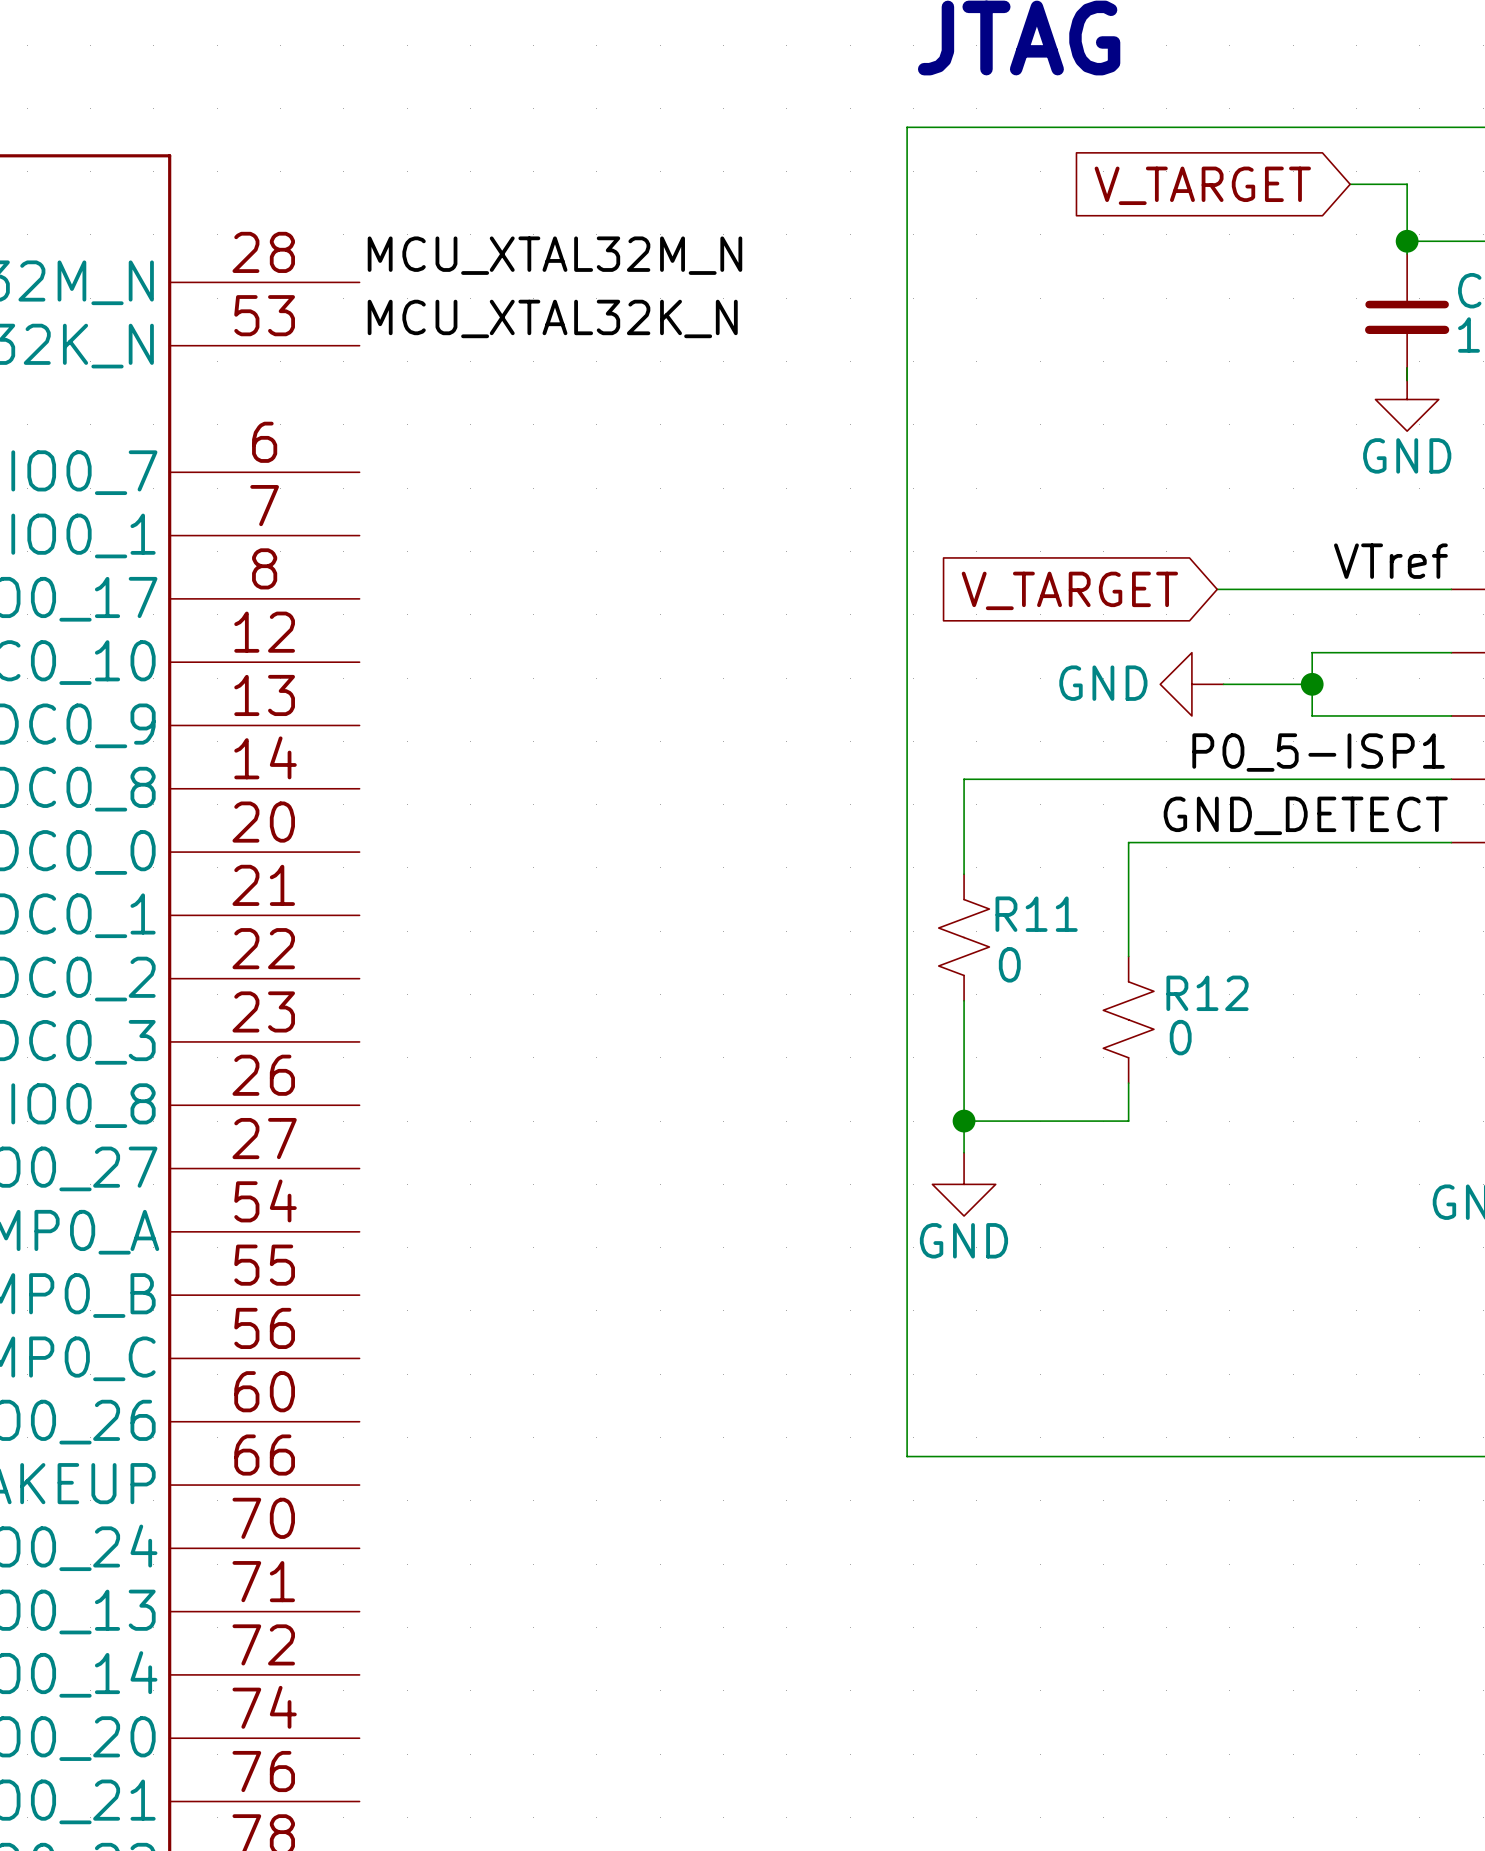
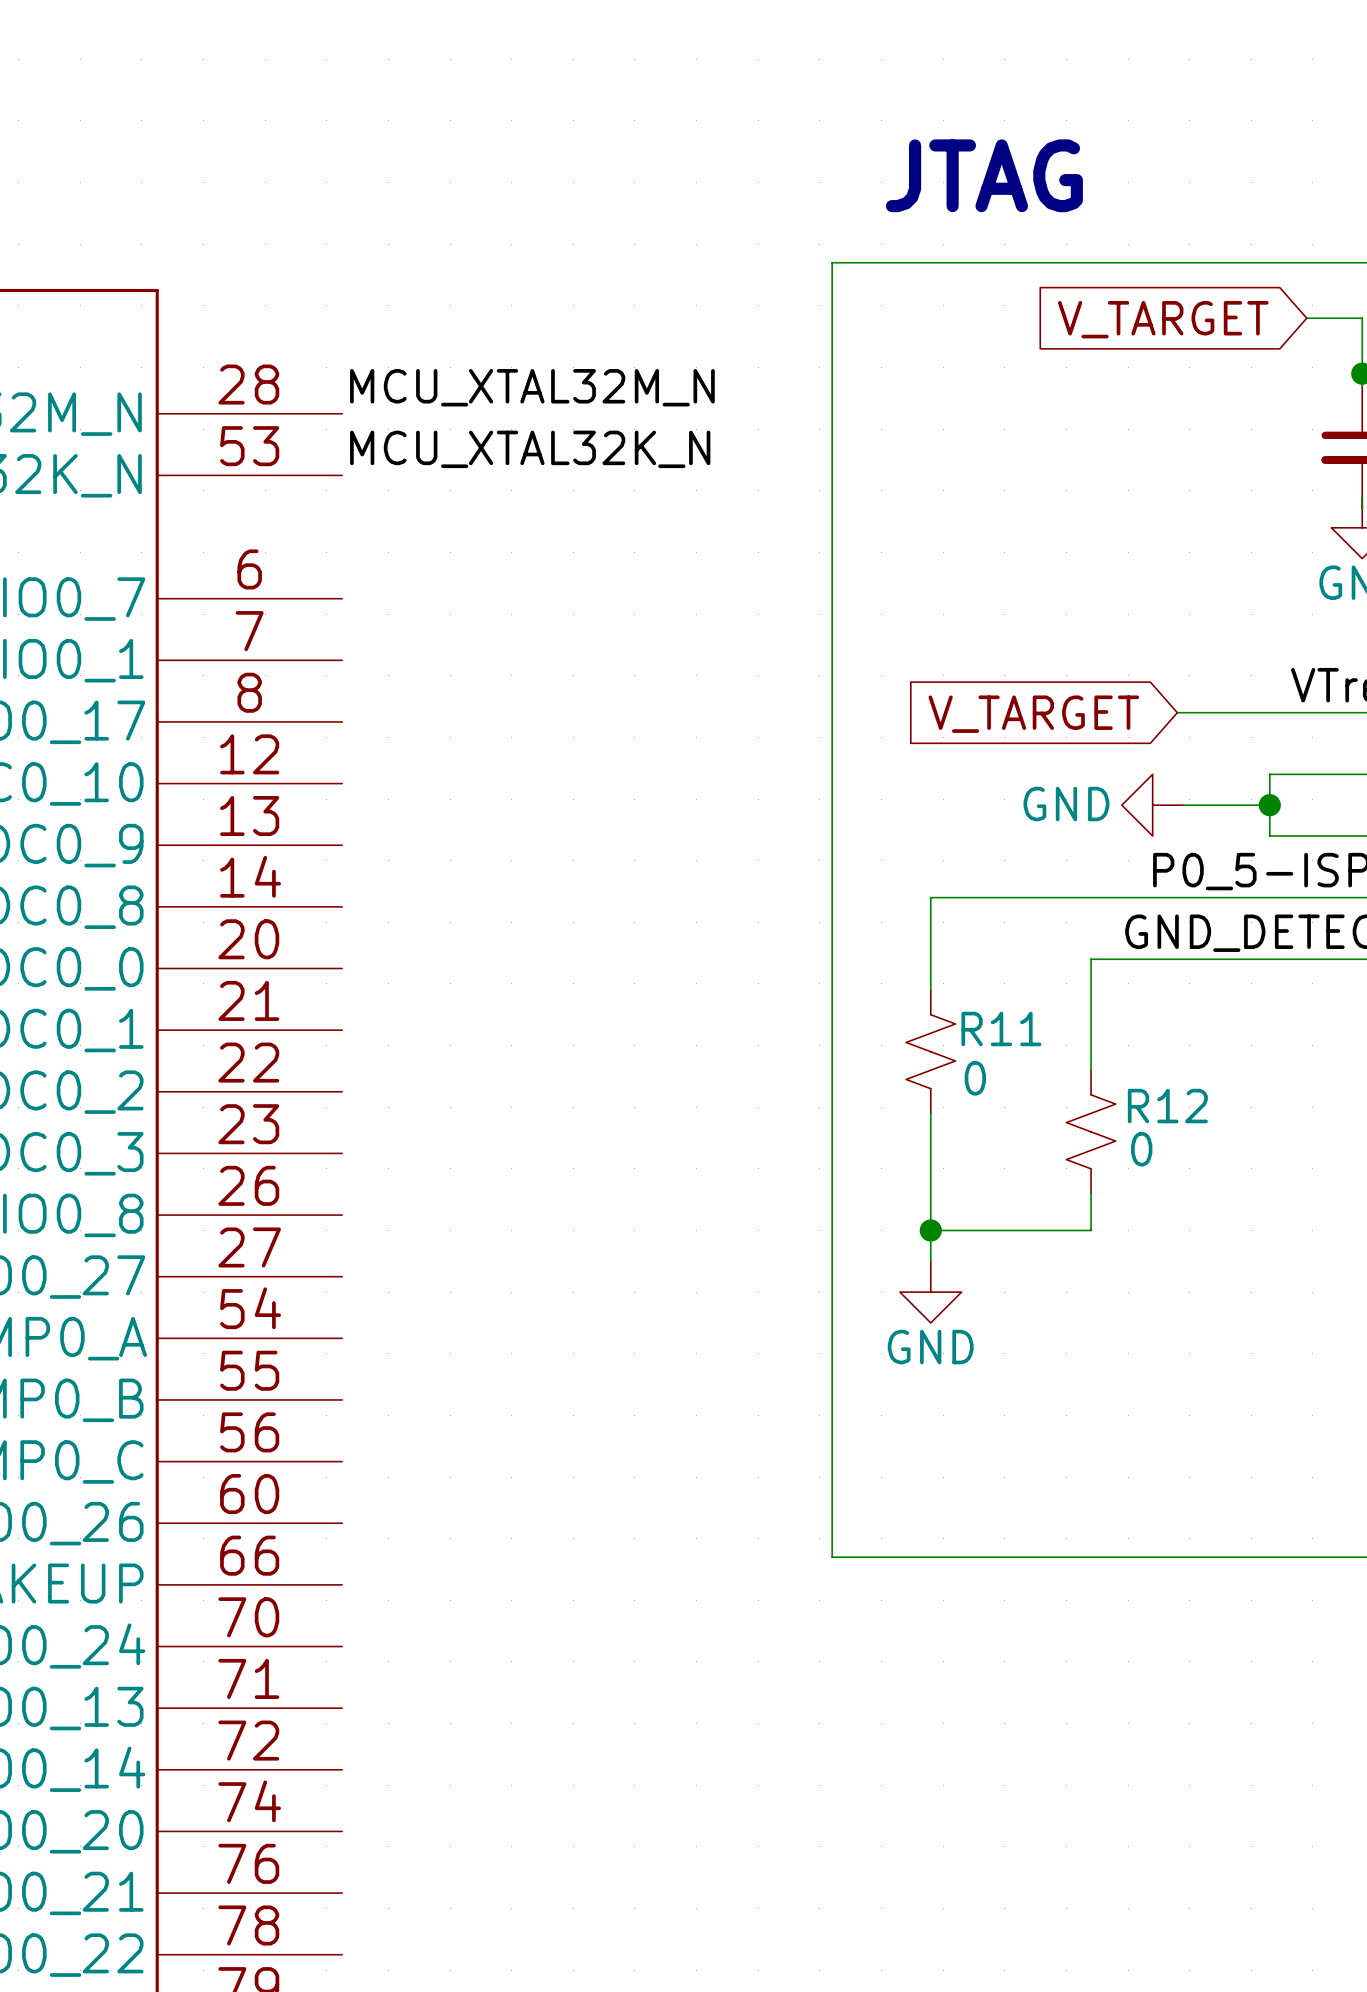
wire: (907, 127) (907, 1456) -> (875, 262) (832, 262) (832, 1557) (875, 1557)

